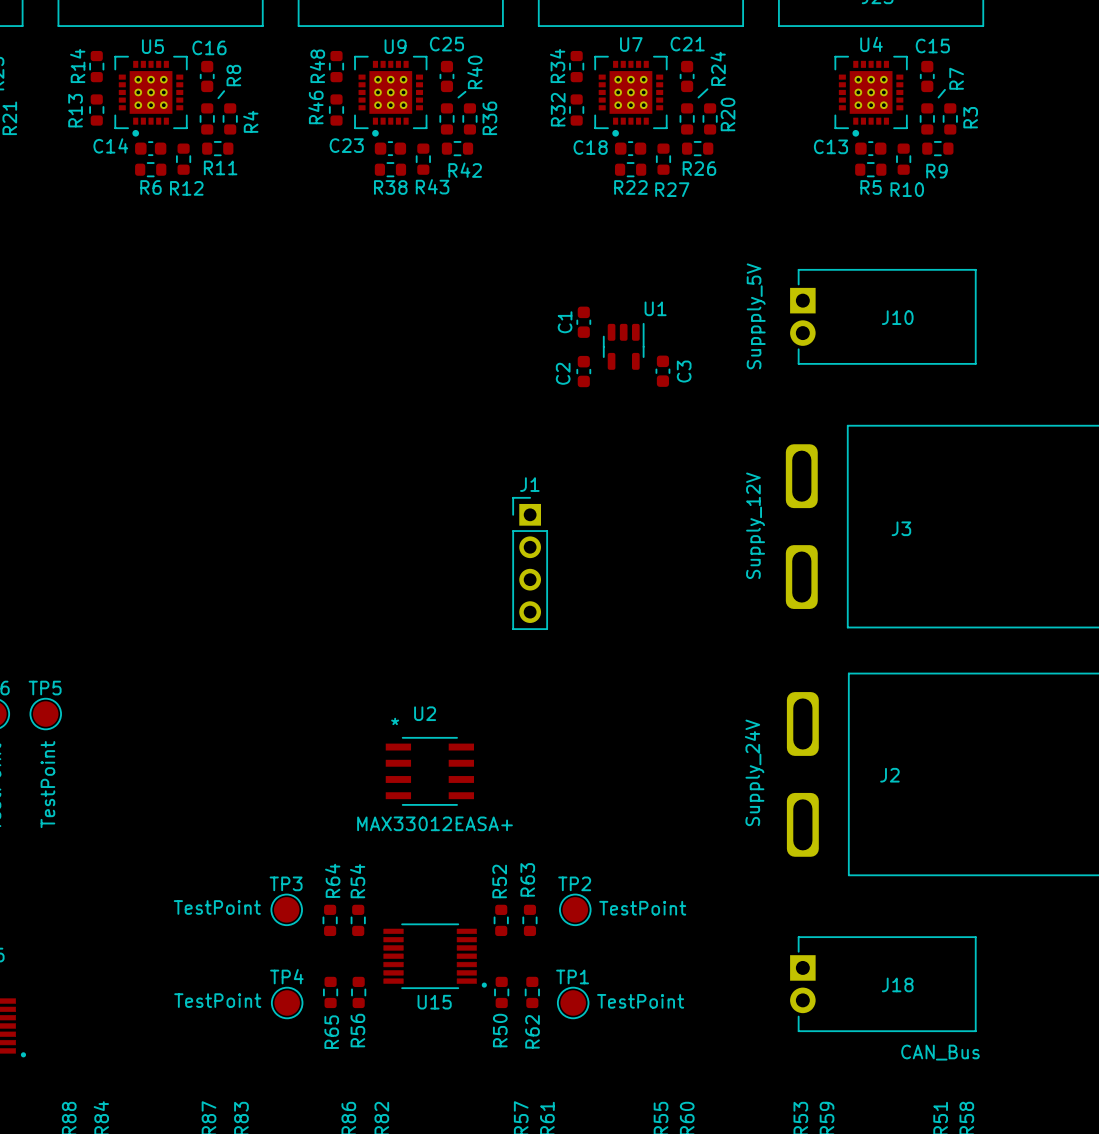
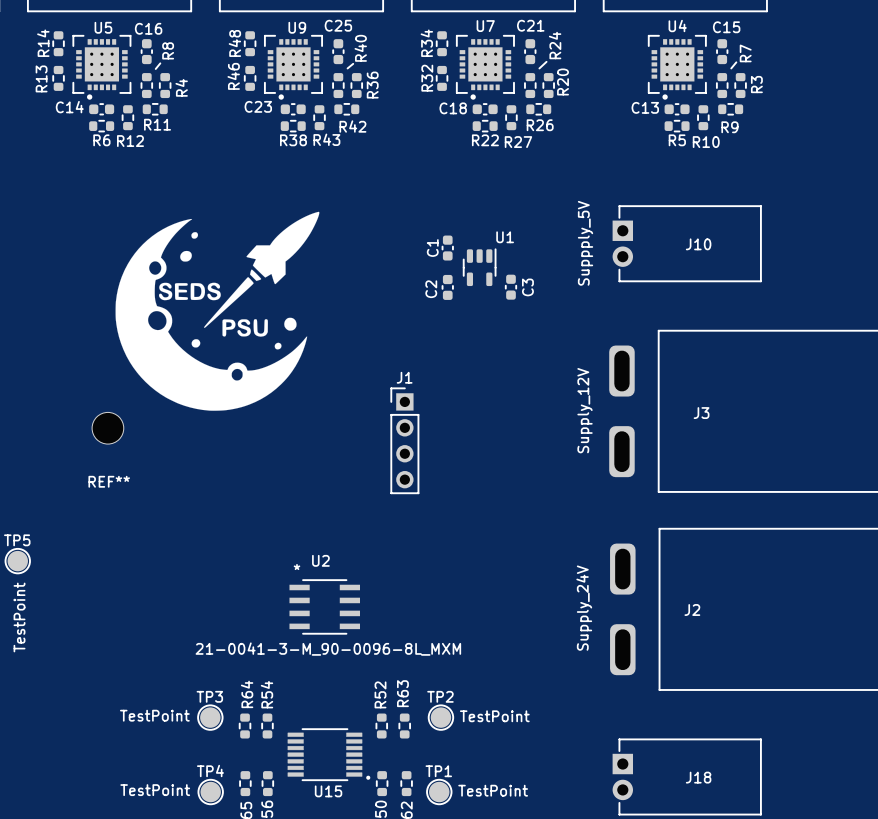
drawing: none -> [115, 211, 320, 411]
REF**: none -> (107, 428)
U2 value: MAX33012EASA+ (435, 823) -> 21-0041-3-M_90-0096-8L_MXM (328, 649)

